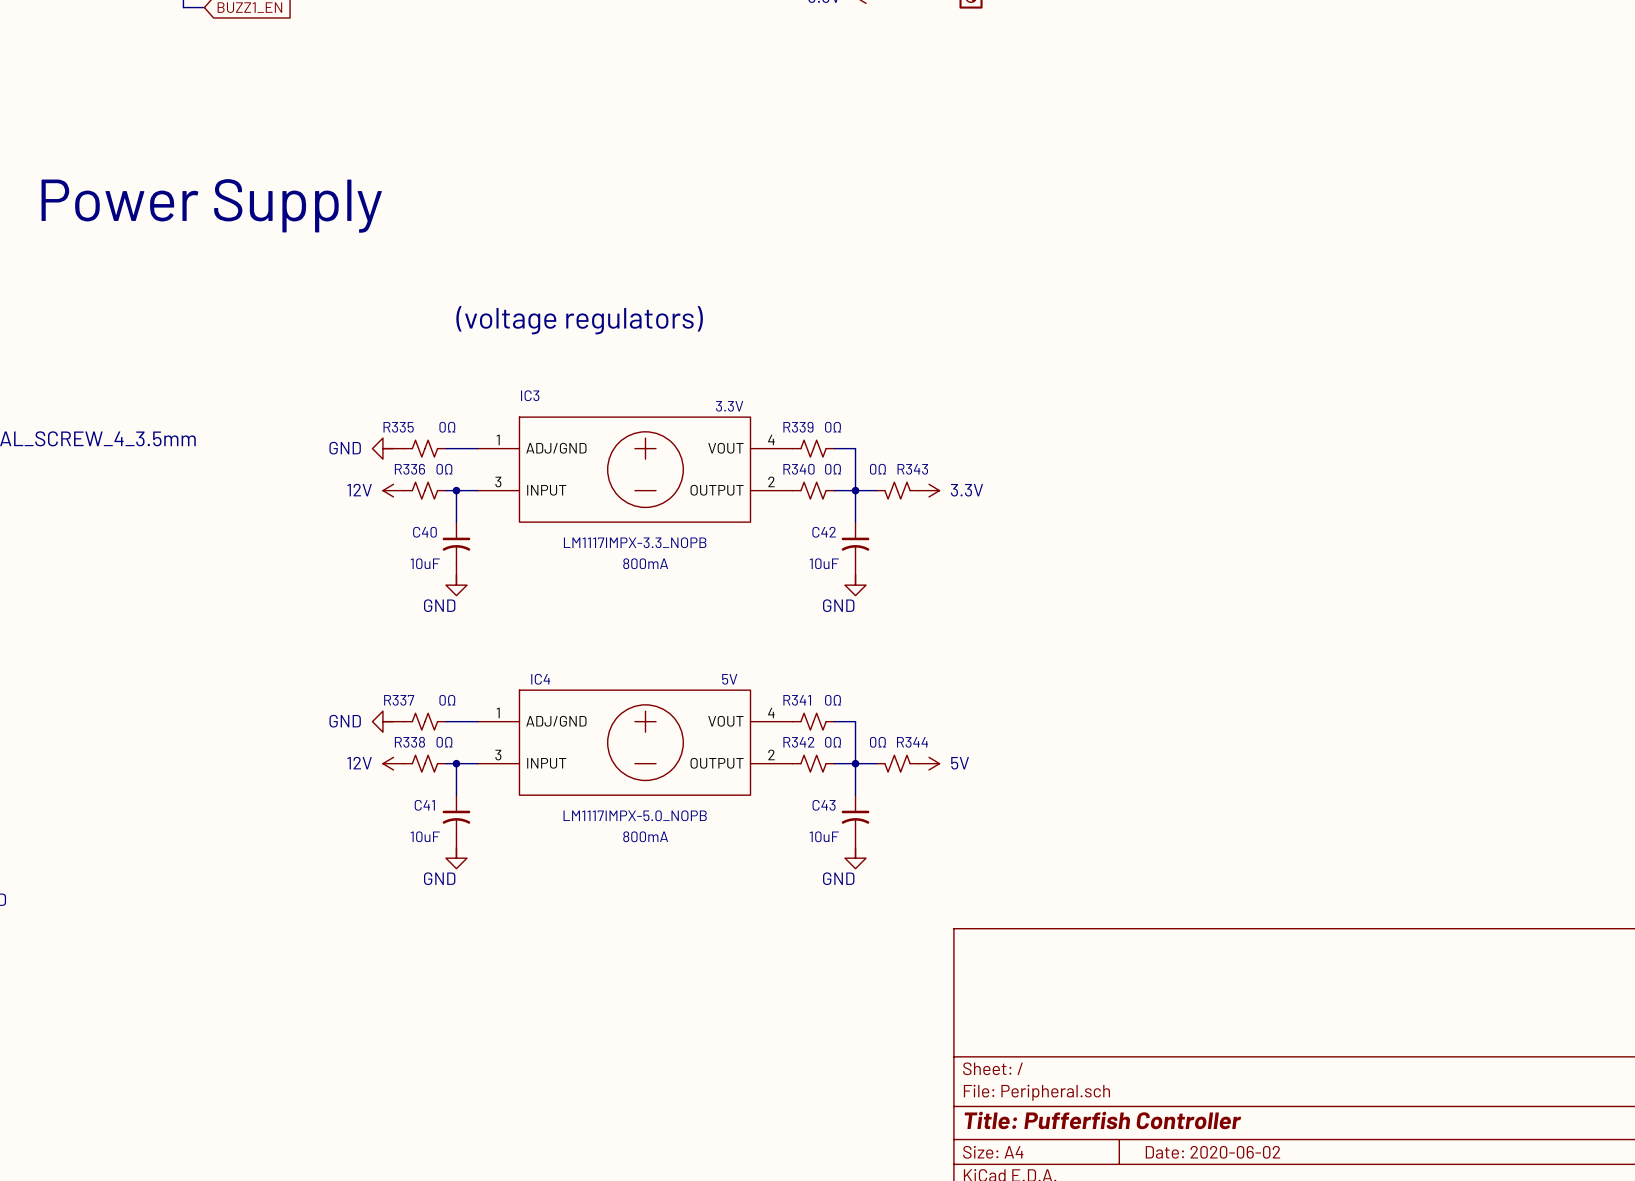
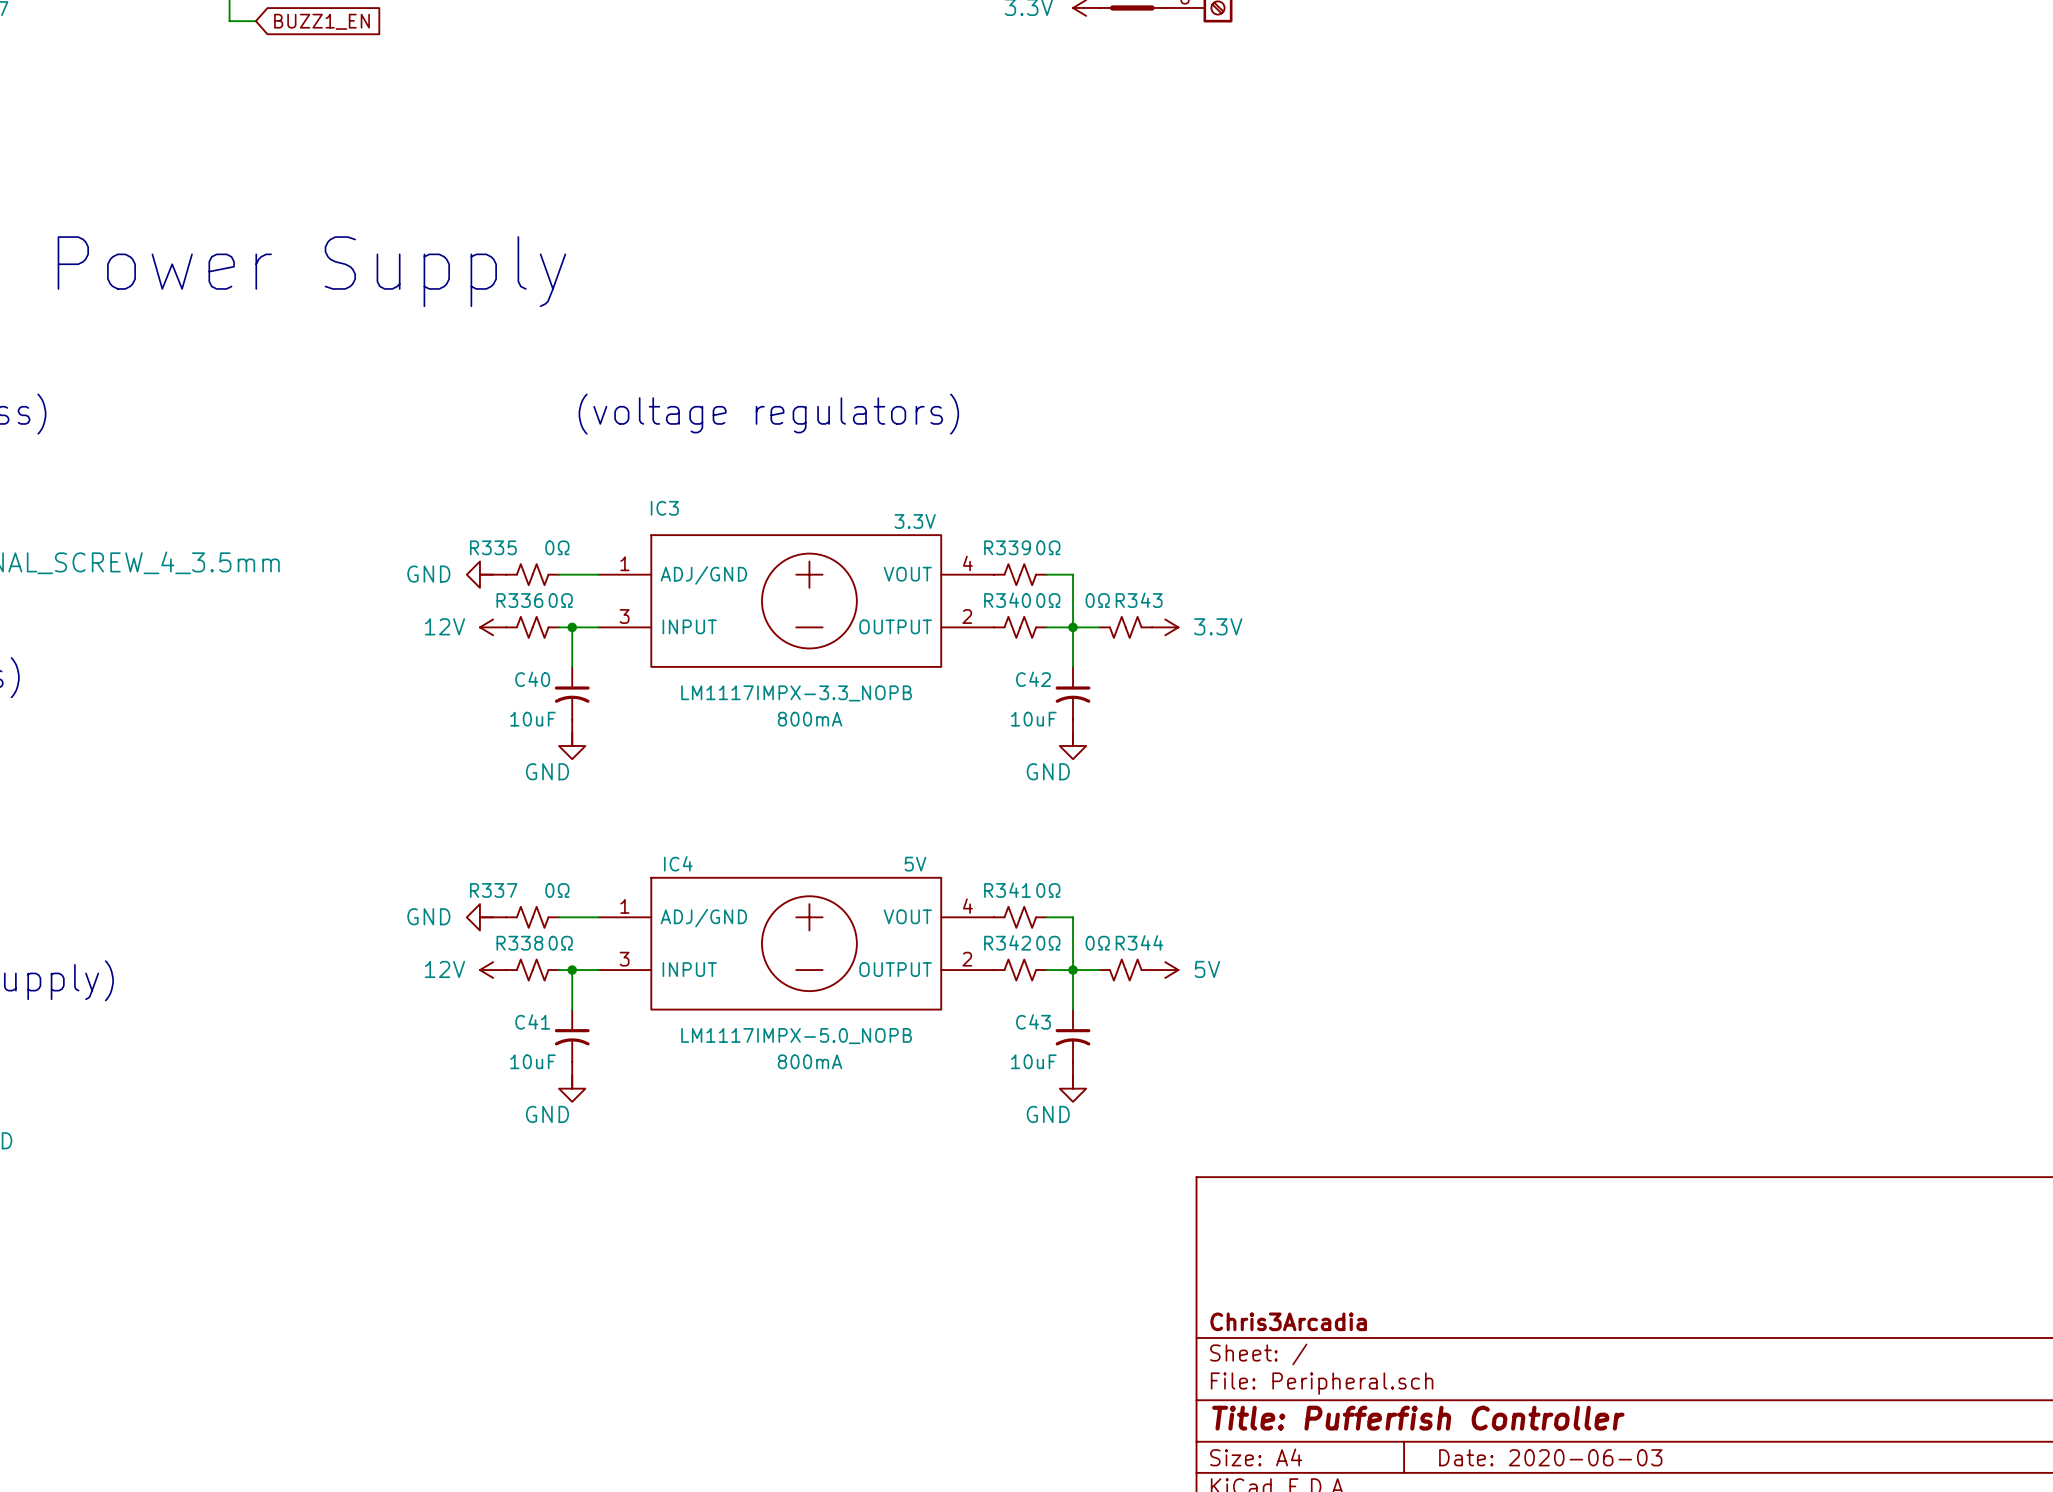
title block: none -> Chris3Arcadia (1288, 1321)
title block: Date: 2020-06-02 (1212, 1152) -> Date: 2020-06-03 (1550, 1457)

